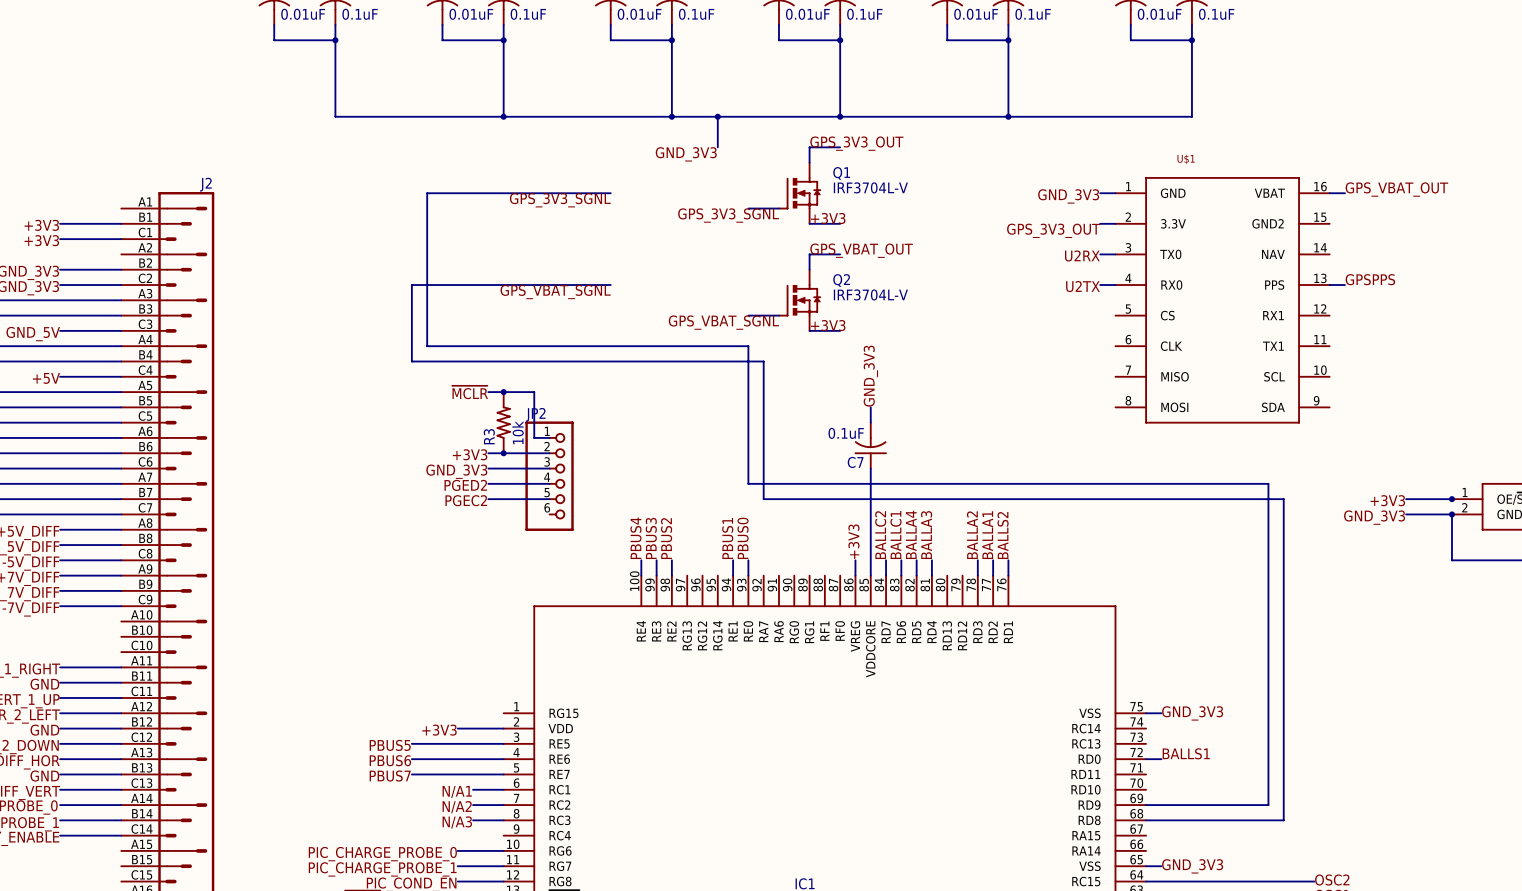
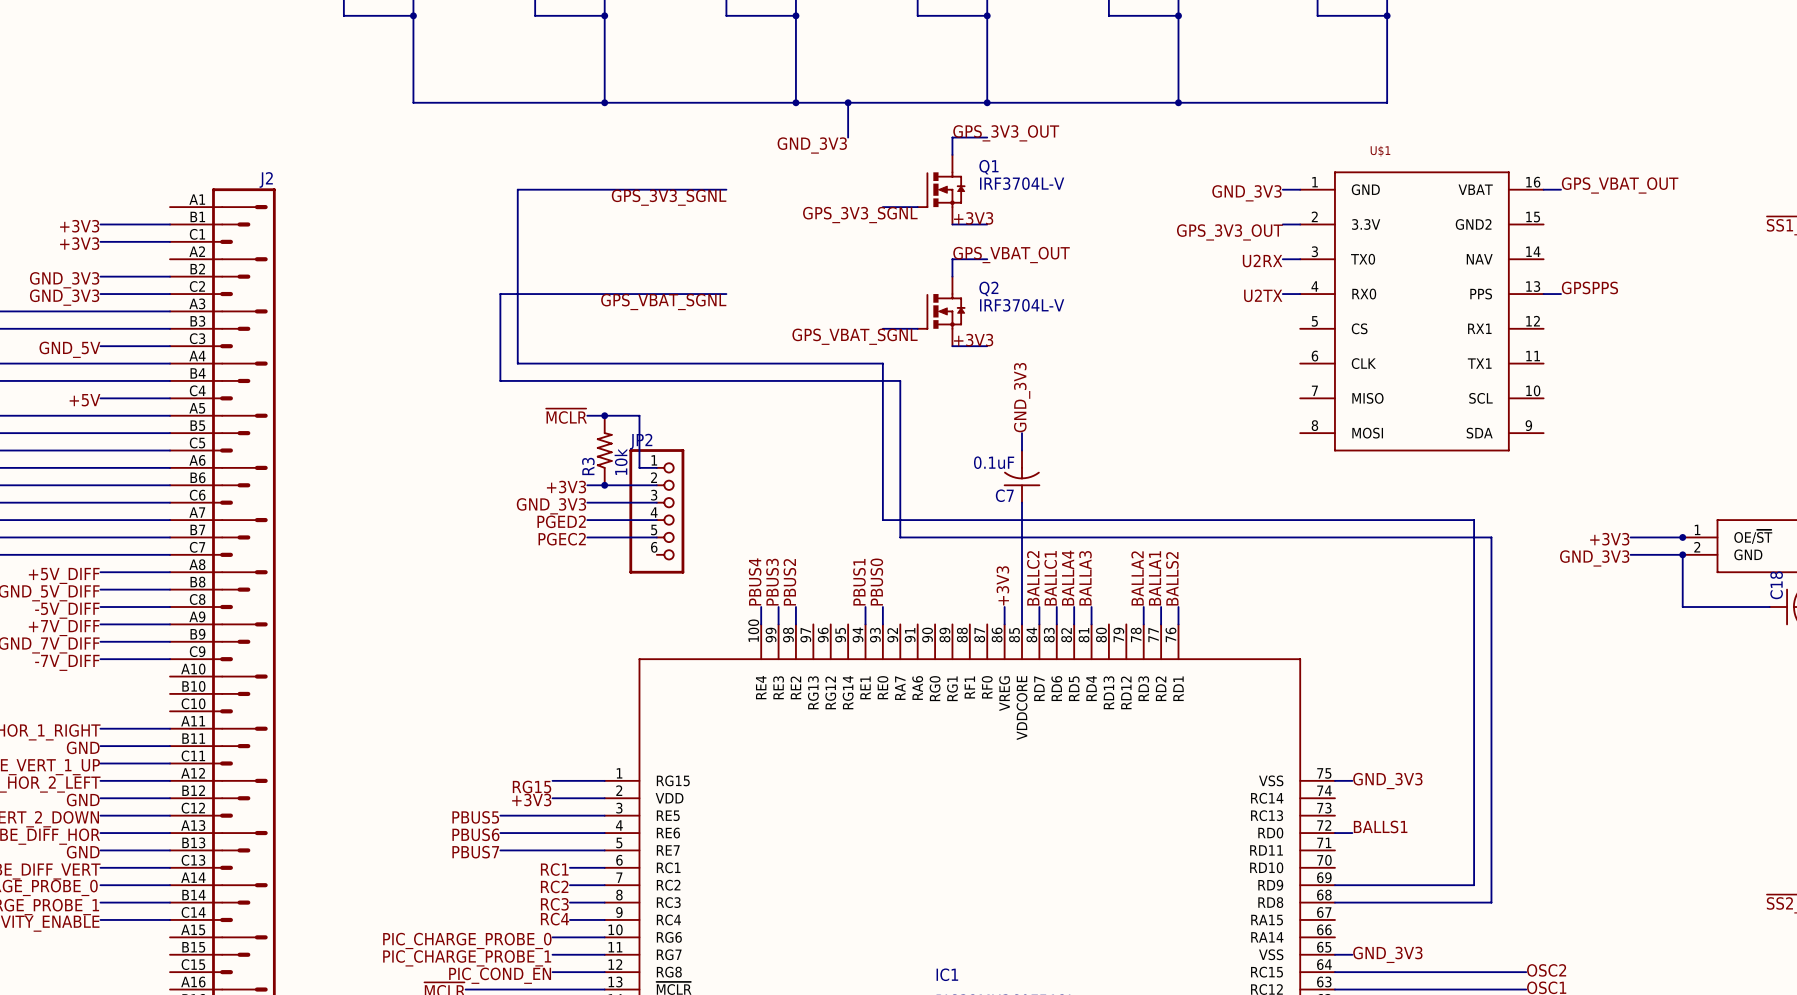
wire: none -> (552, 780) (604, 780)
label: none -> RG15 (532, 786)
label: N/A1 (457, 791) -> RC1 (554, 869)
label: N/A2 (457, 807) -> RC2 (554, 886)
label: N/A3 (457, 822) -> RC3 (554, 904)
label: none -> RC4 (555, 919)
wire: none -> (569, 919) (604, 919)

